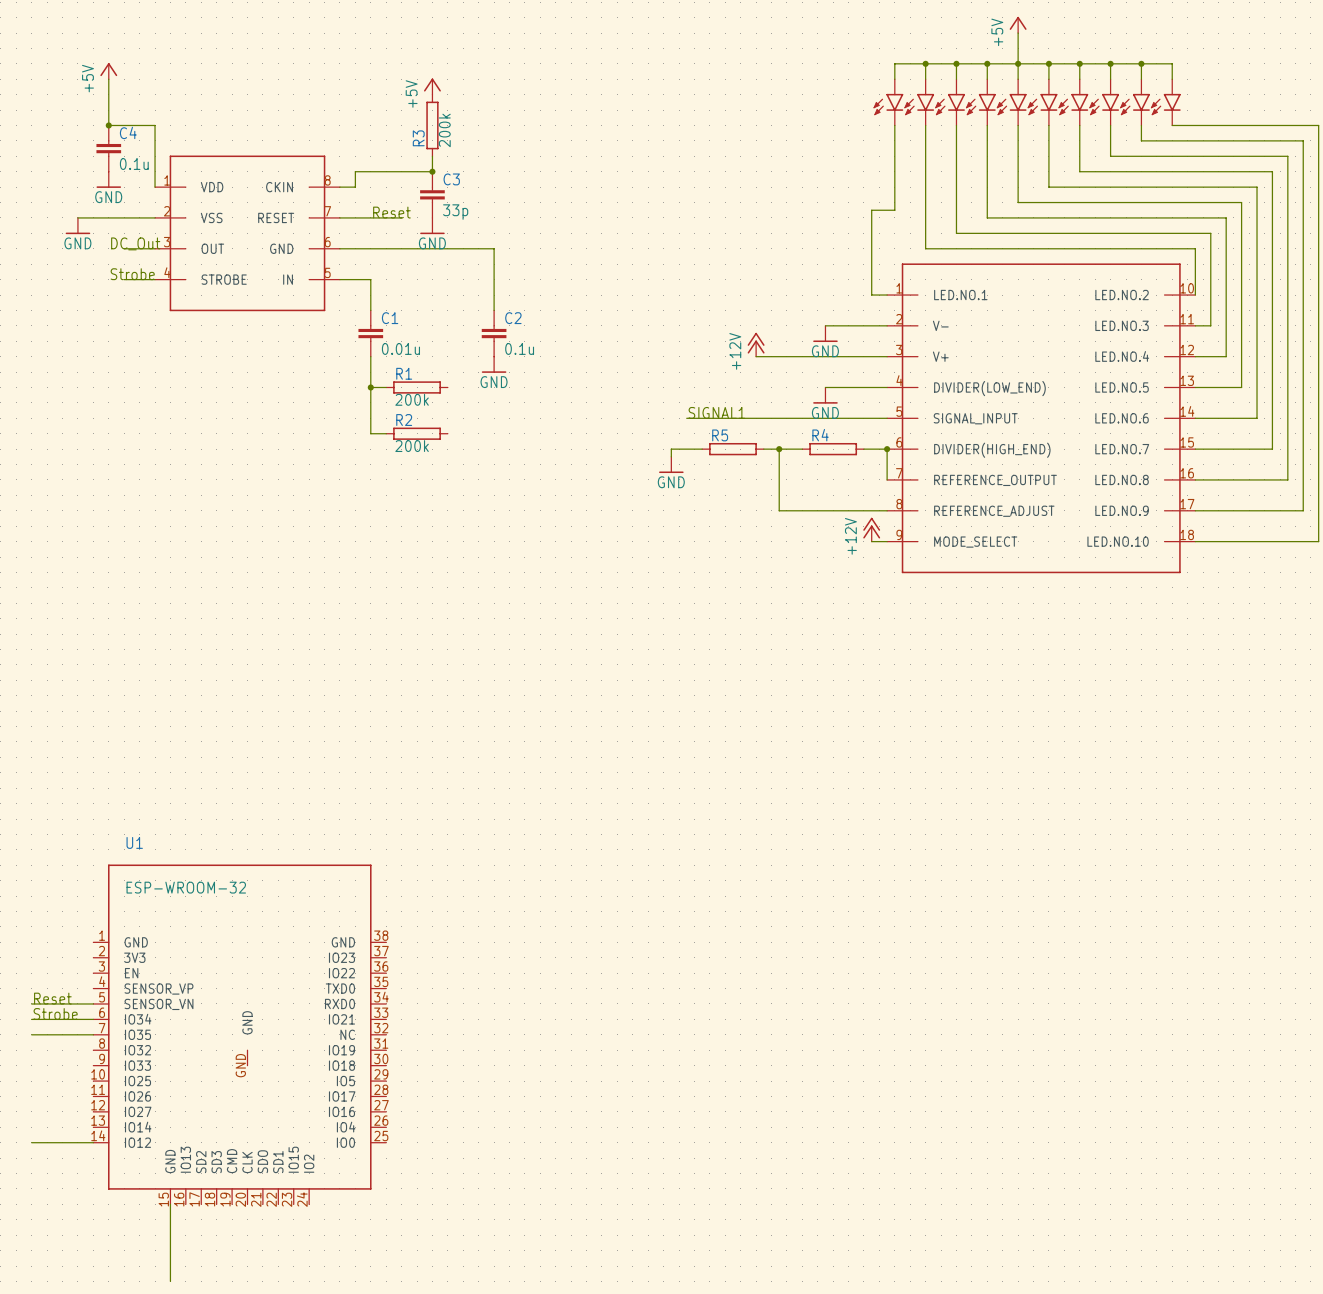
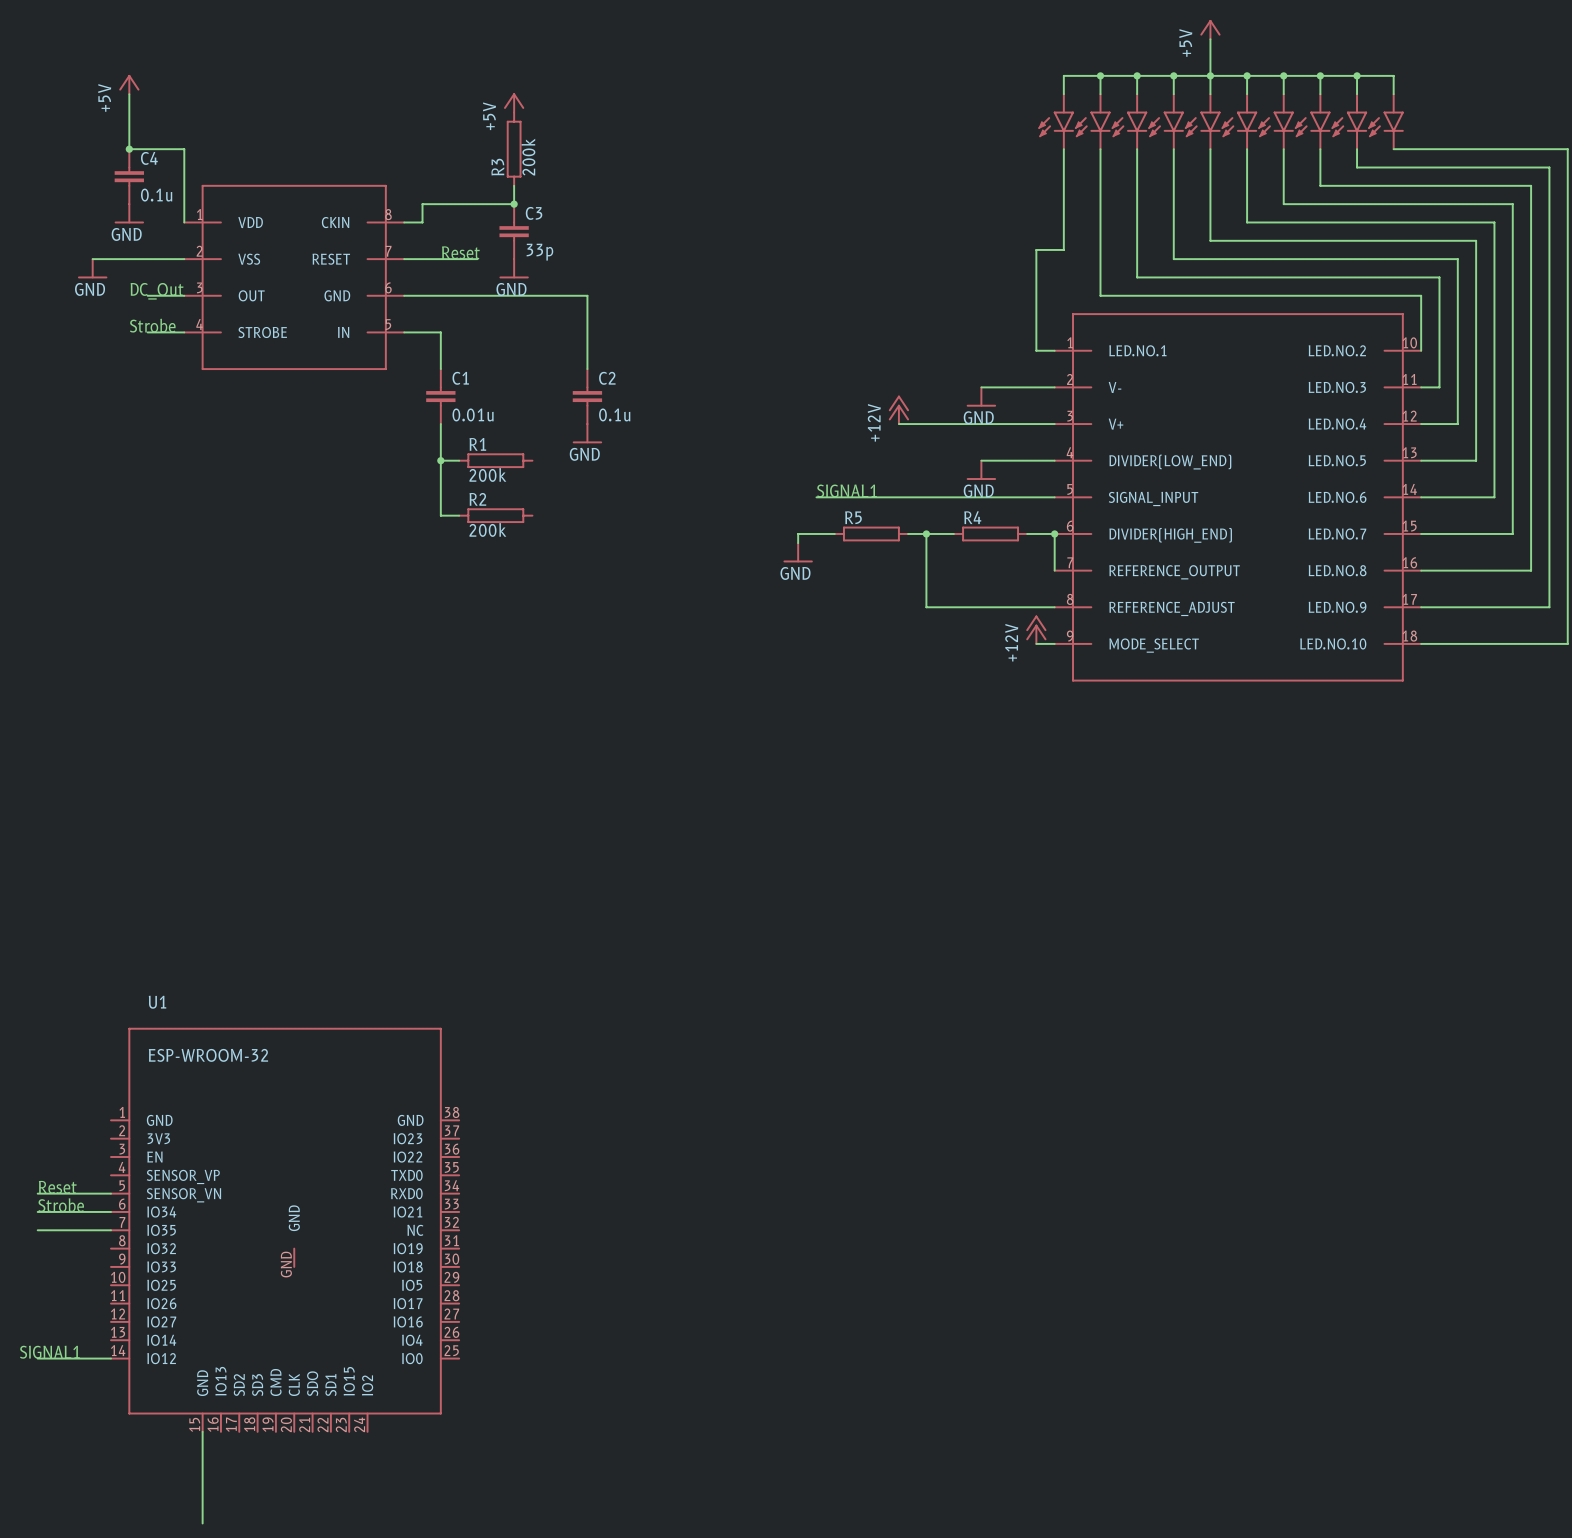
text: none -> SIGNAL1 (49, 1352)

